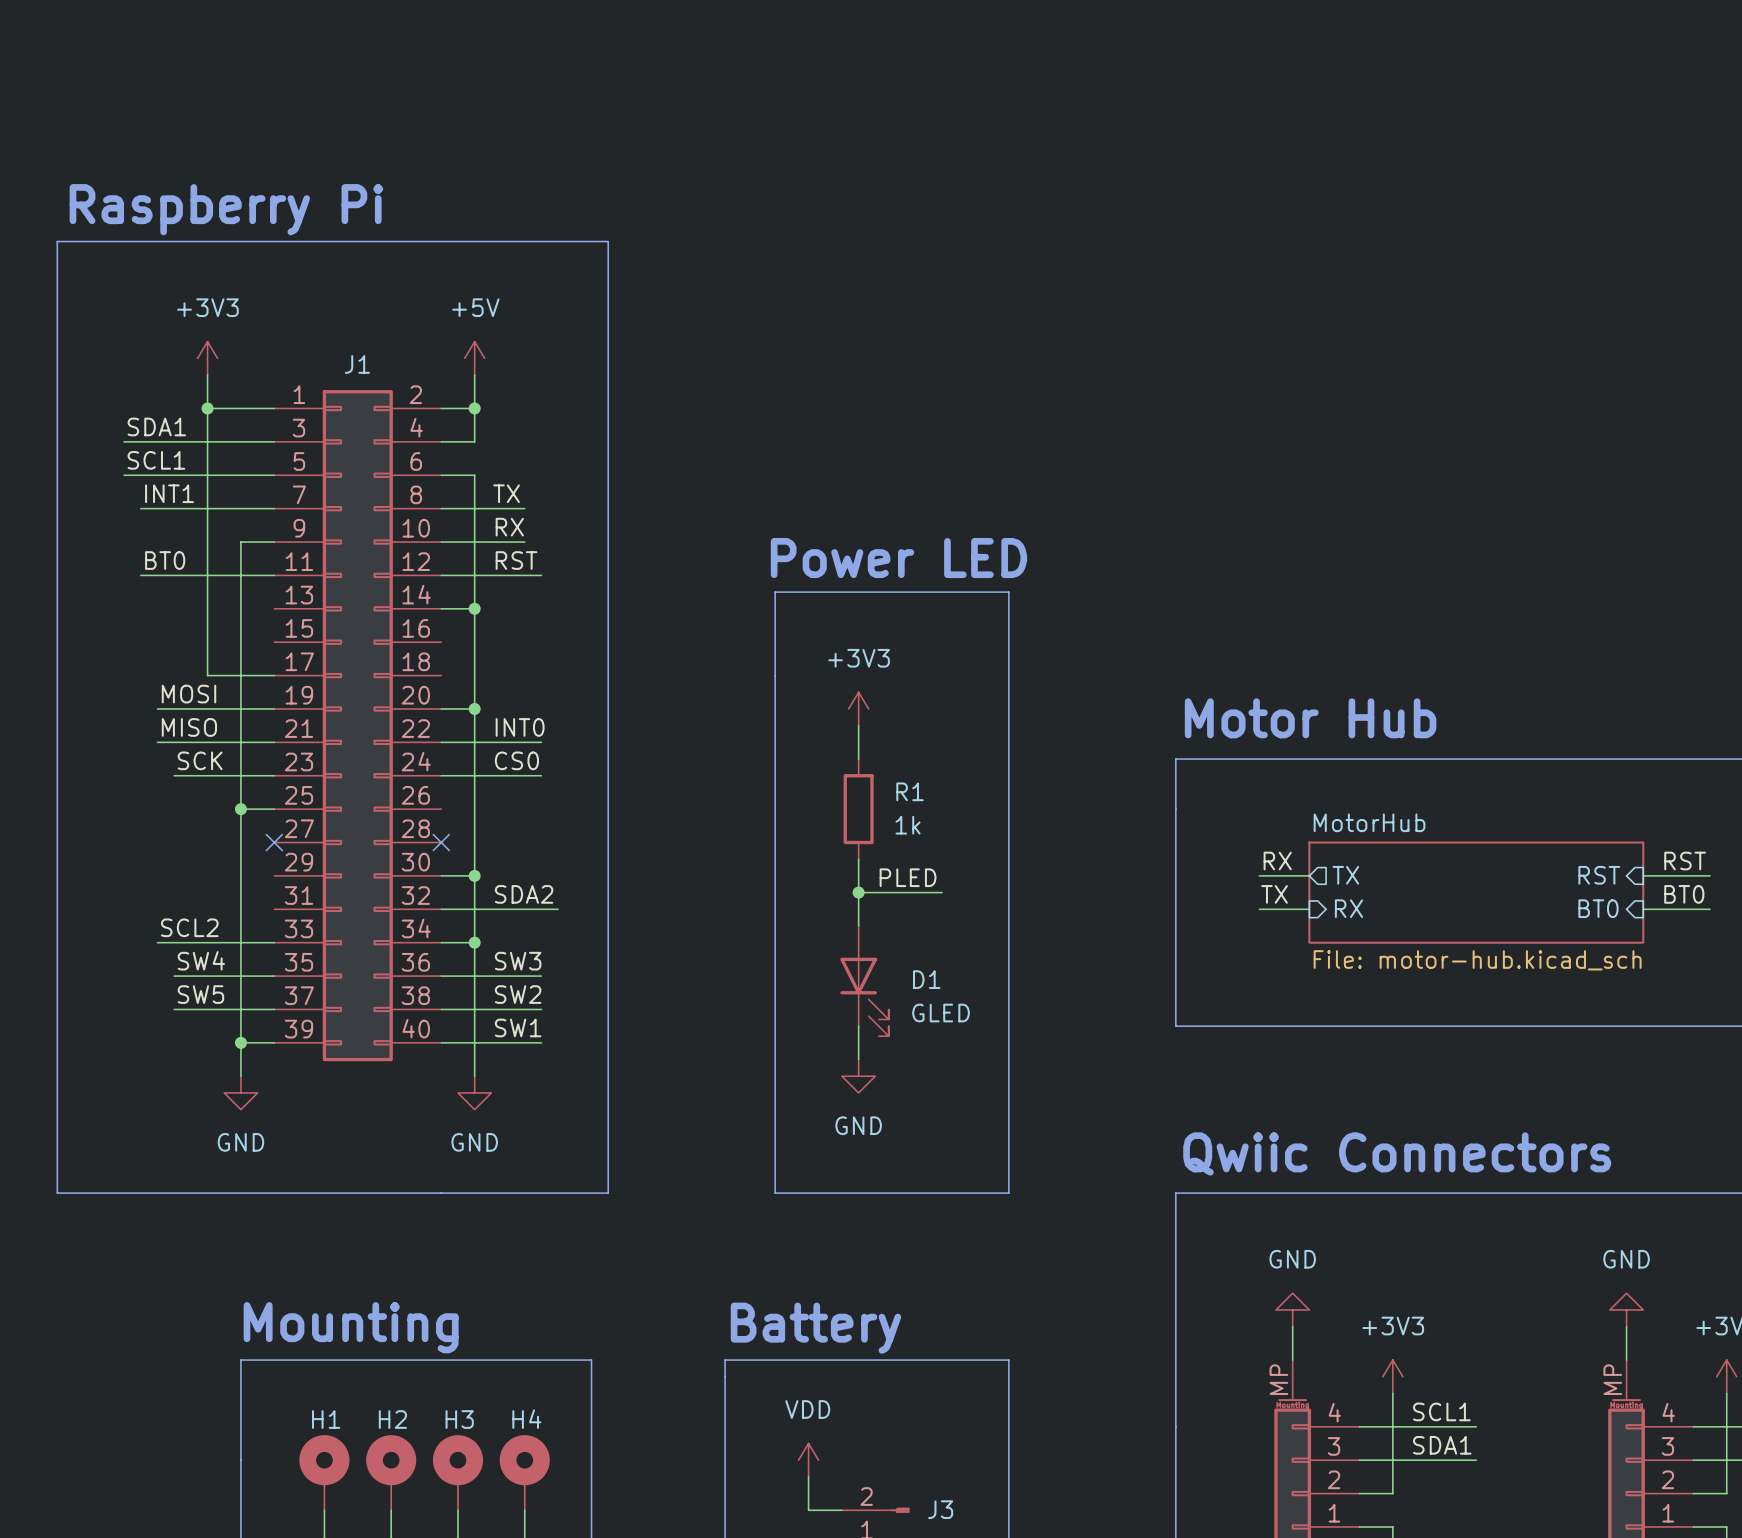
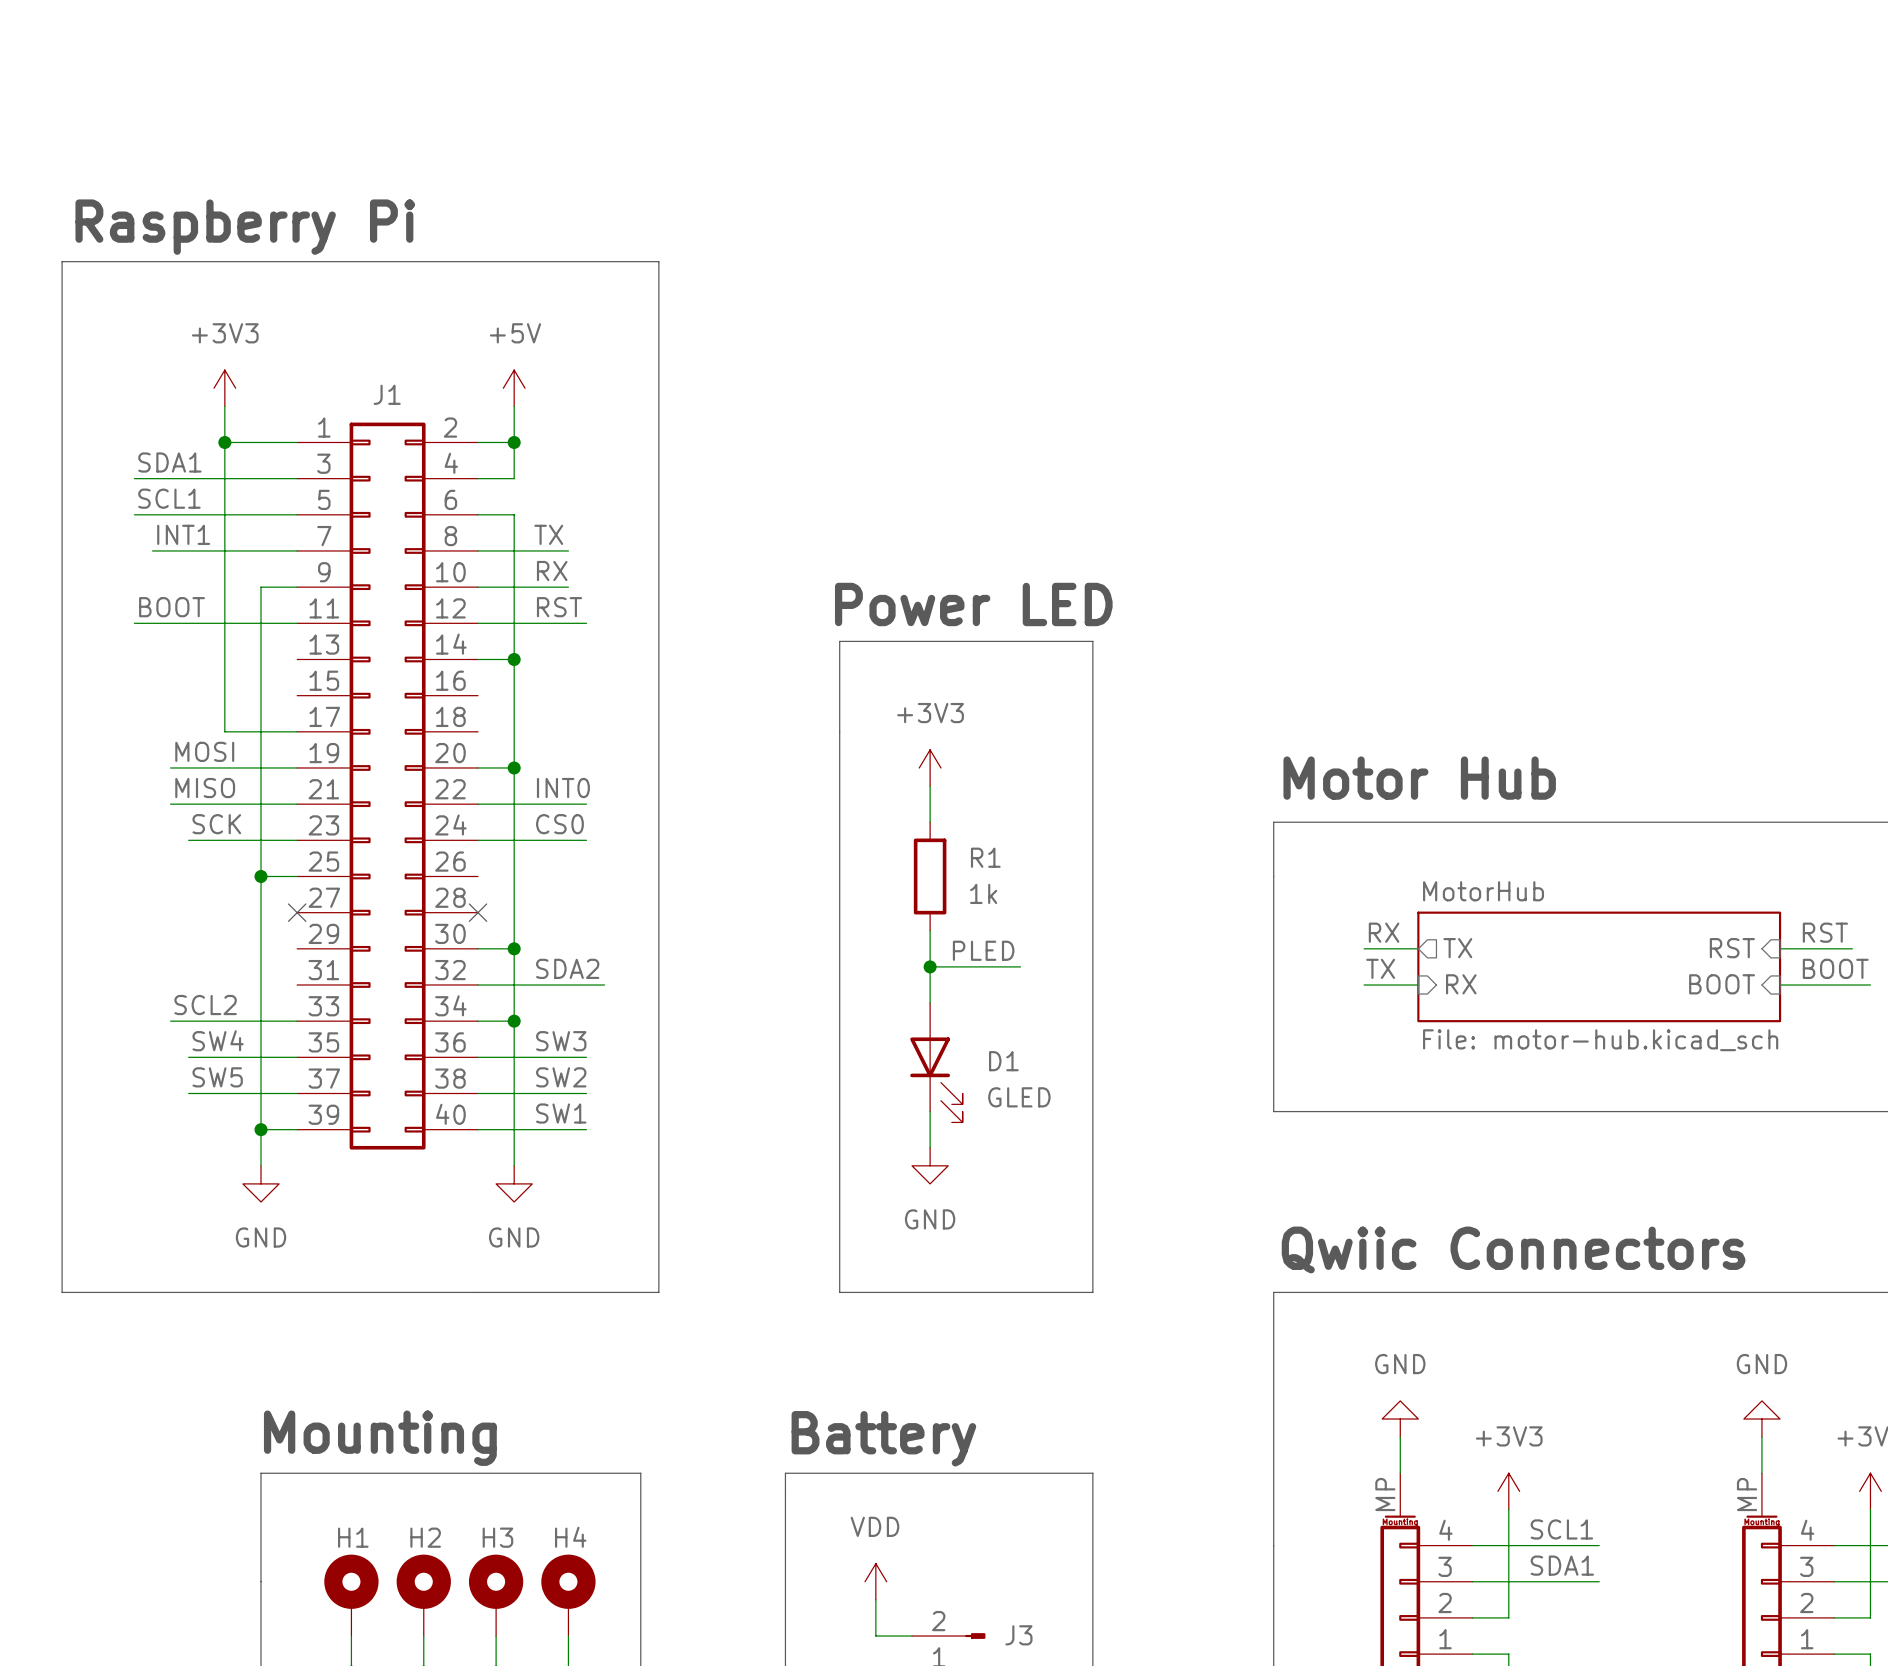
label: none -> BOOT (172, 607)
label: BT0 (165, 560) -> none
wire: none -> (134, 623) (152, 623)
label: BT0 (1684, 894) -> BOOT (1835, 968)
sheet pin: BT0 (1598, 908) -> BOOT (1722, 984)
wire: none -> (1852, 984) (1870, 984)

